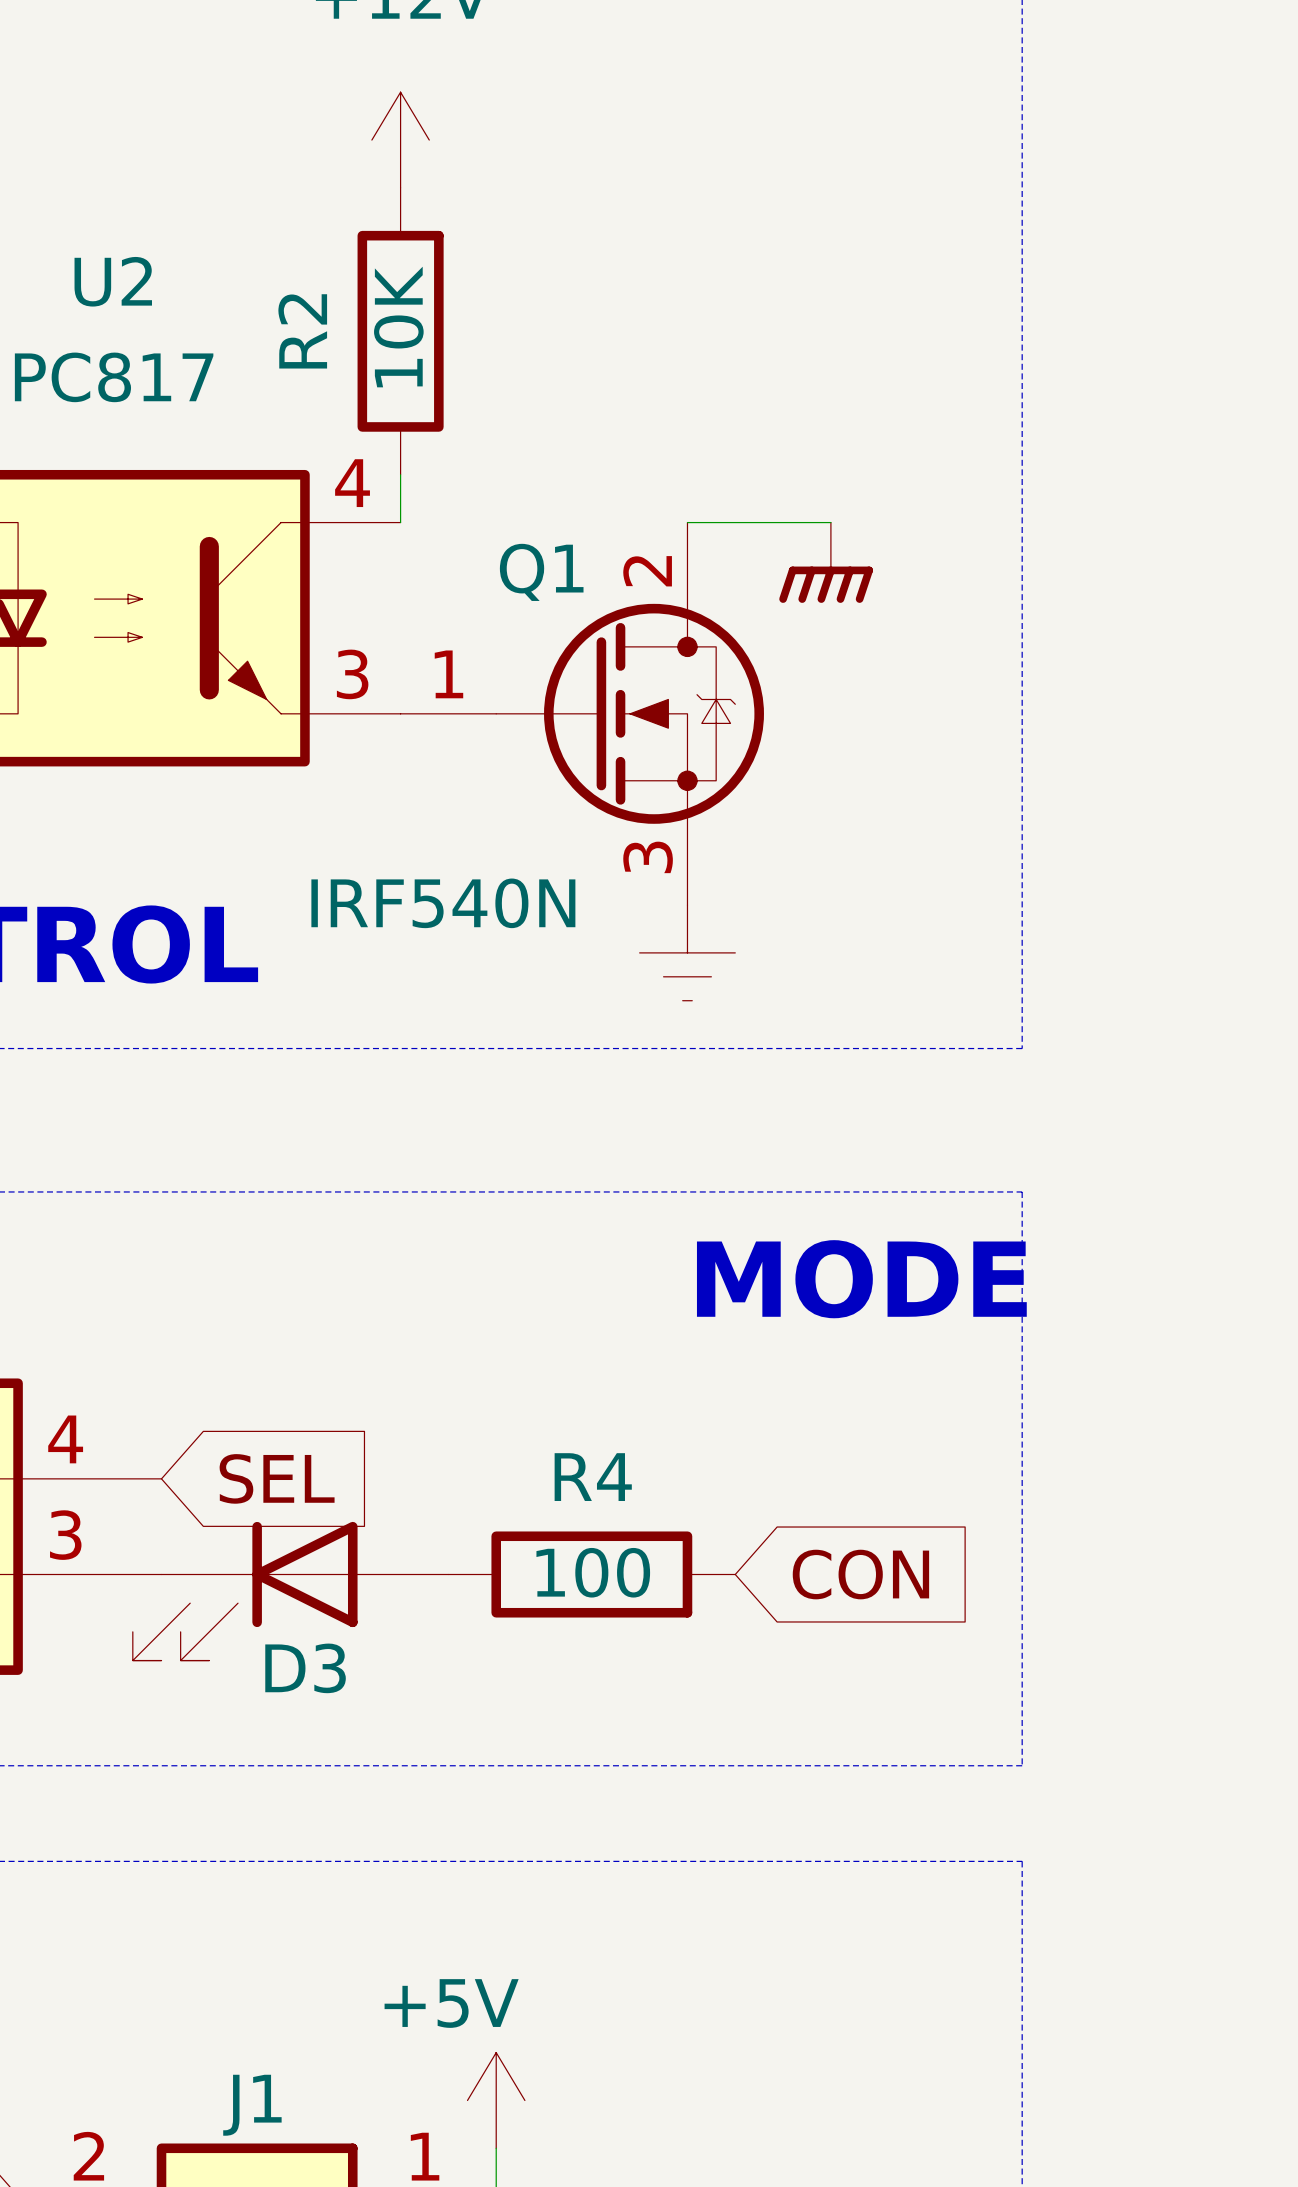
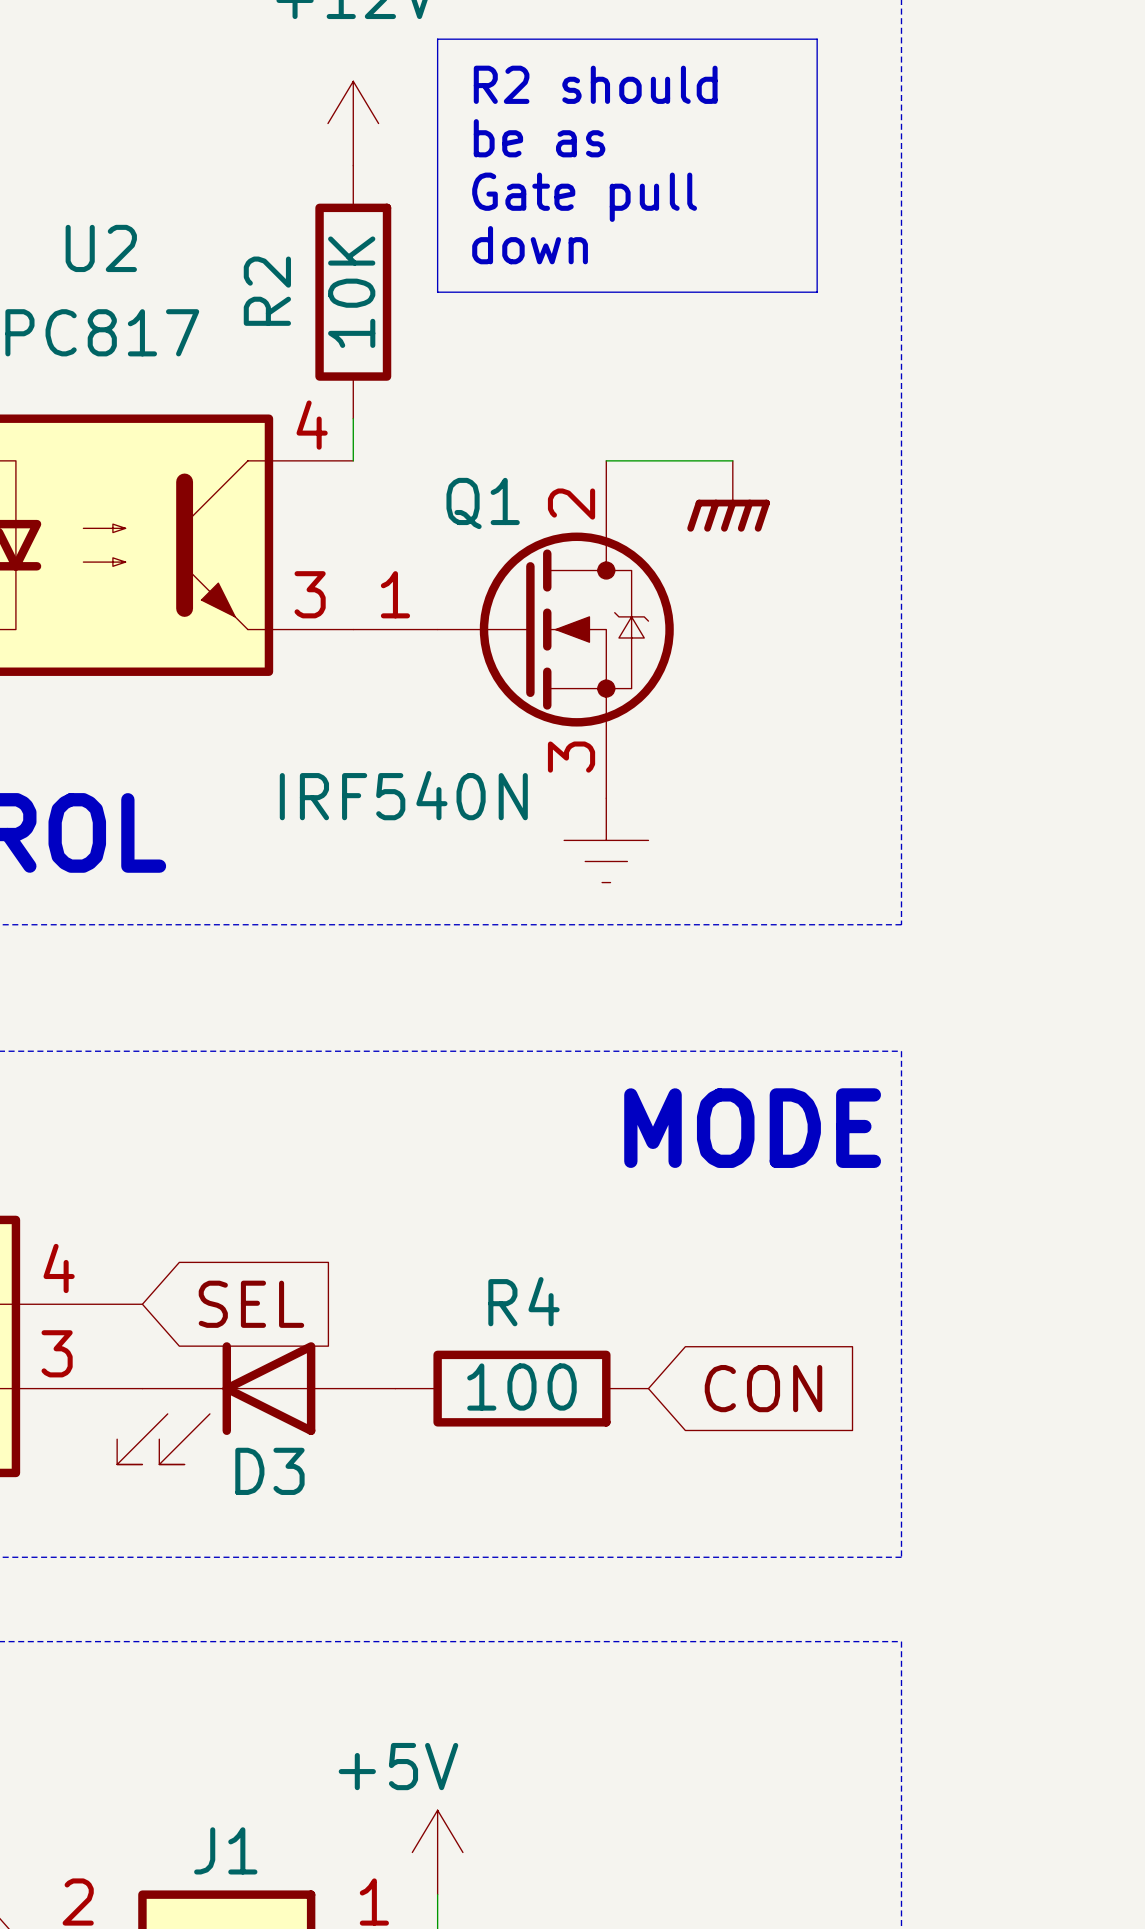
line: none -> (437, 39) (817, 39) (817, 292) (437, 292) (437, 39)
text: none -> R2 should (595, 84)
text: none -> be as (539, 138)
text: none -> Gate pull (584, 197)
text: none -> down (530, 245)

